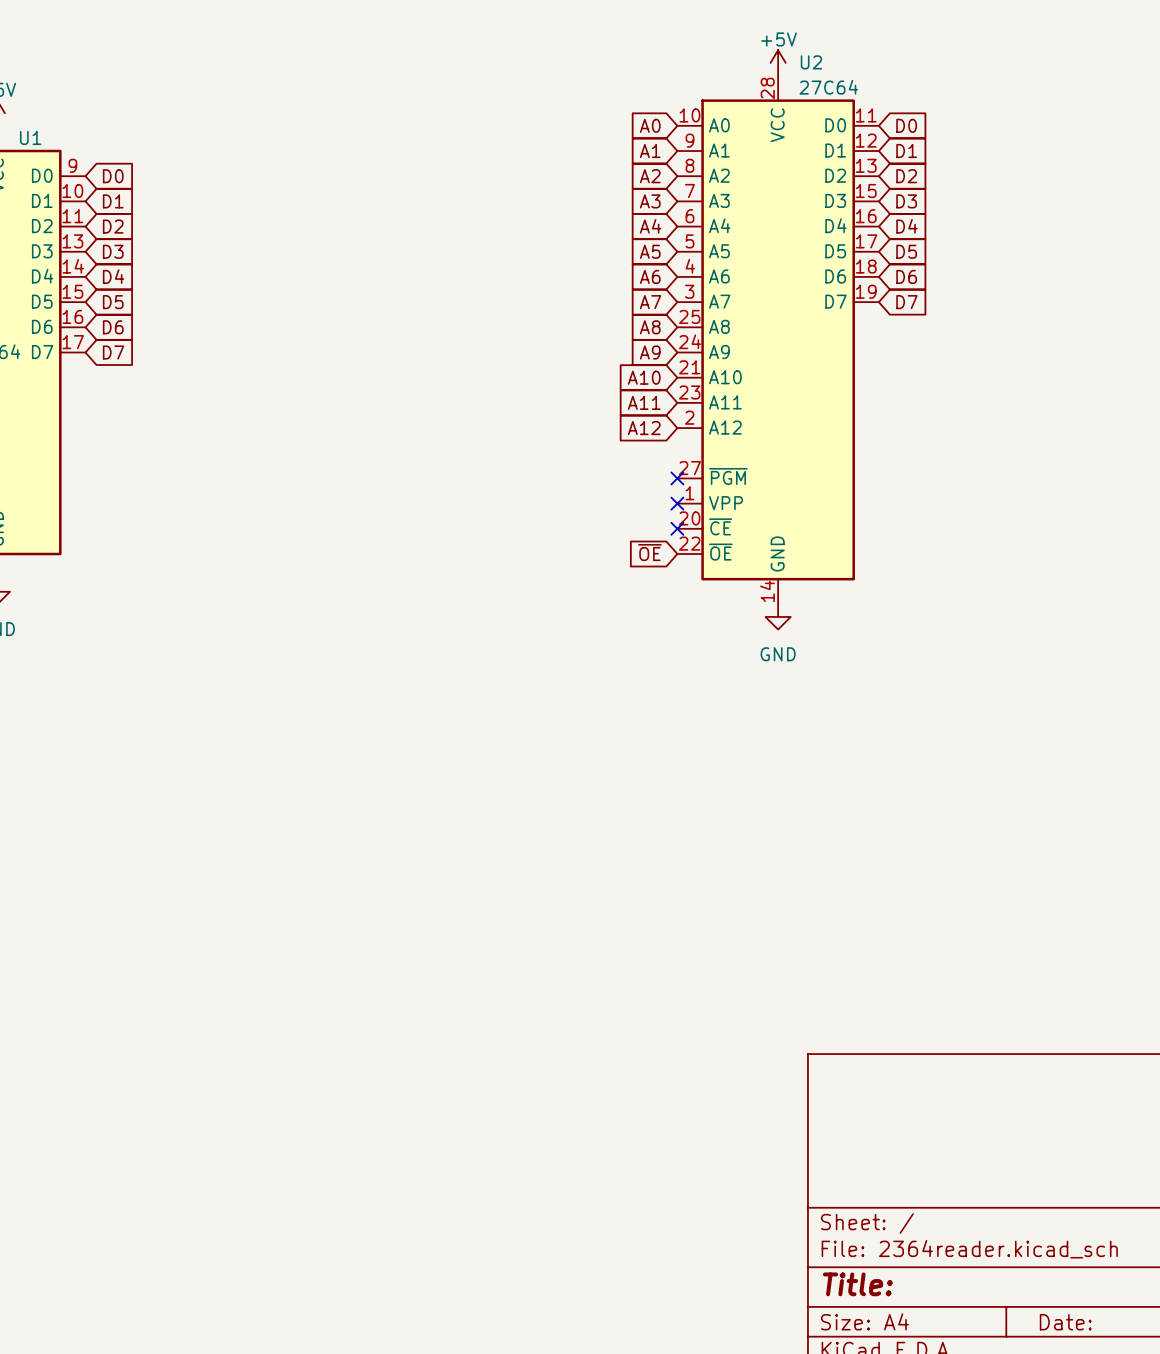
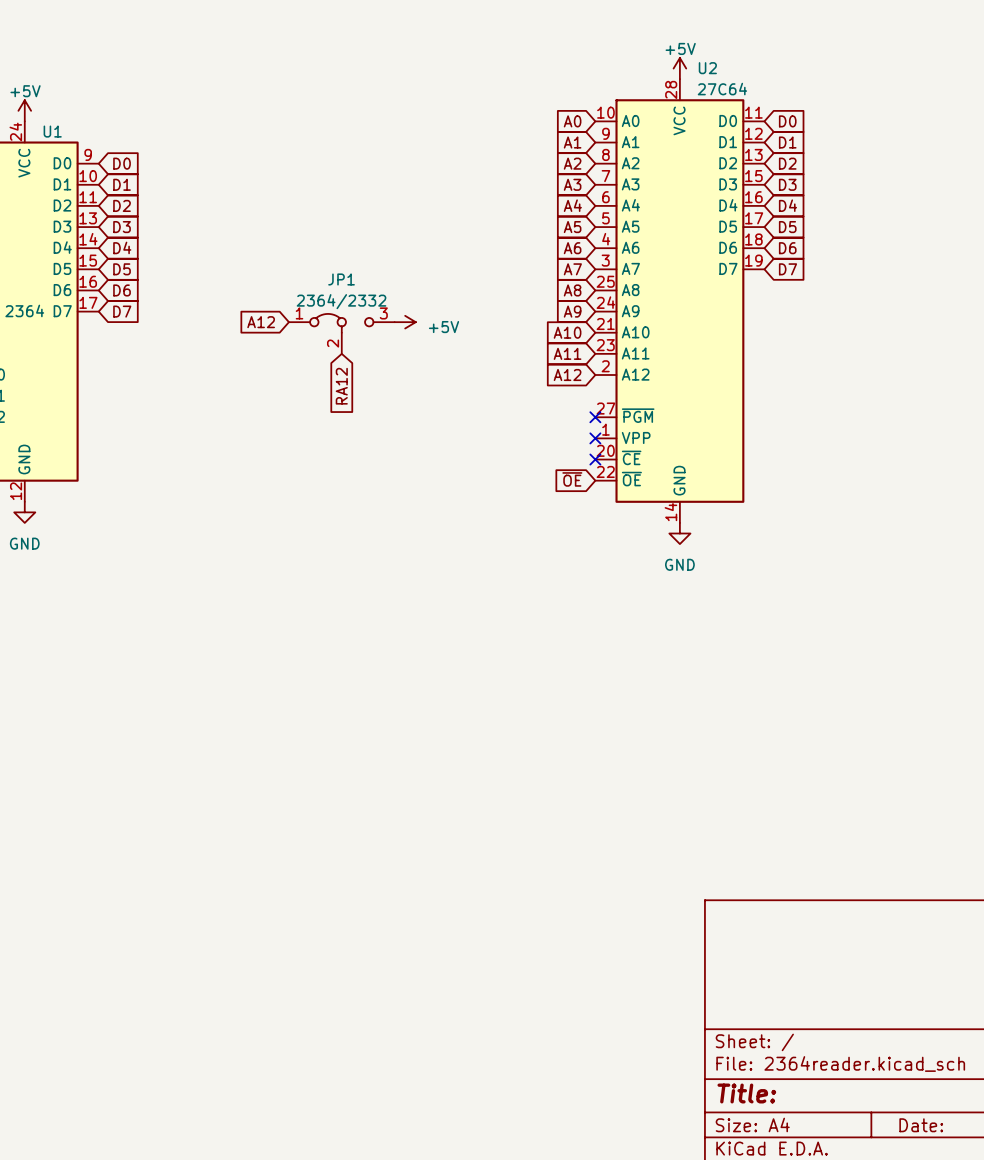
global label: none -> A12 (261, 322)
power symbol: none -> +5V (405, 322)
JP1: none -> 2364/2332 (341, 333)
global label: none -> RA12 (341, 386)

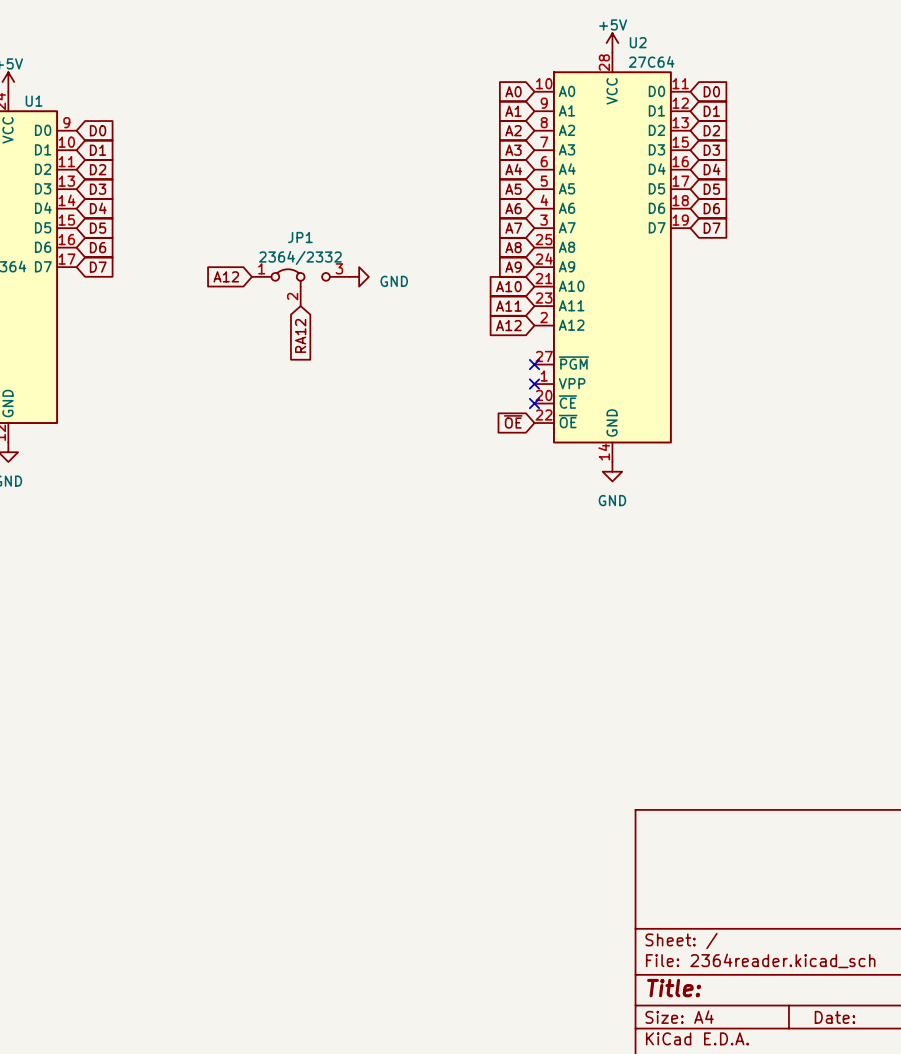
power symbol: +5V (405, 322) -> GND (359, 276)

